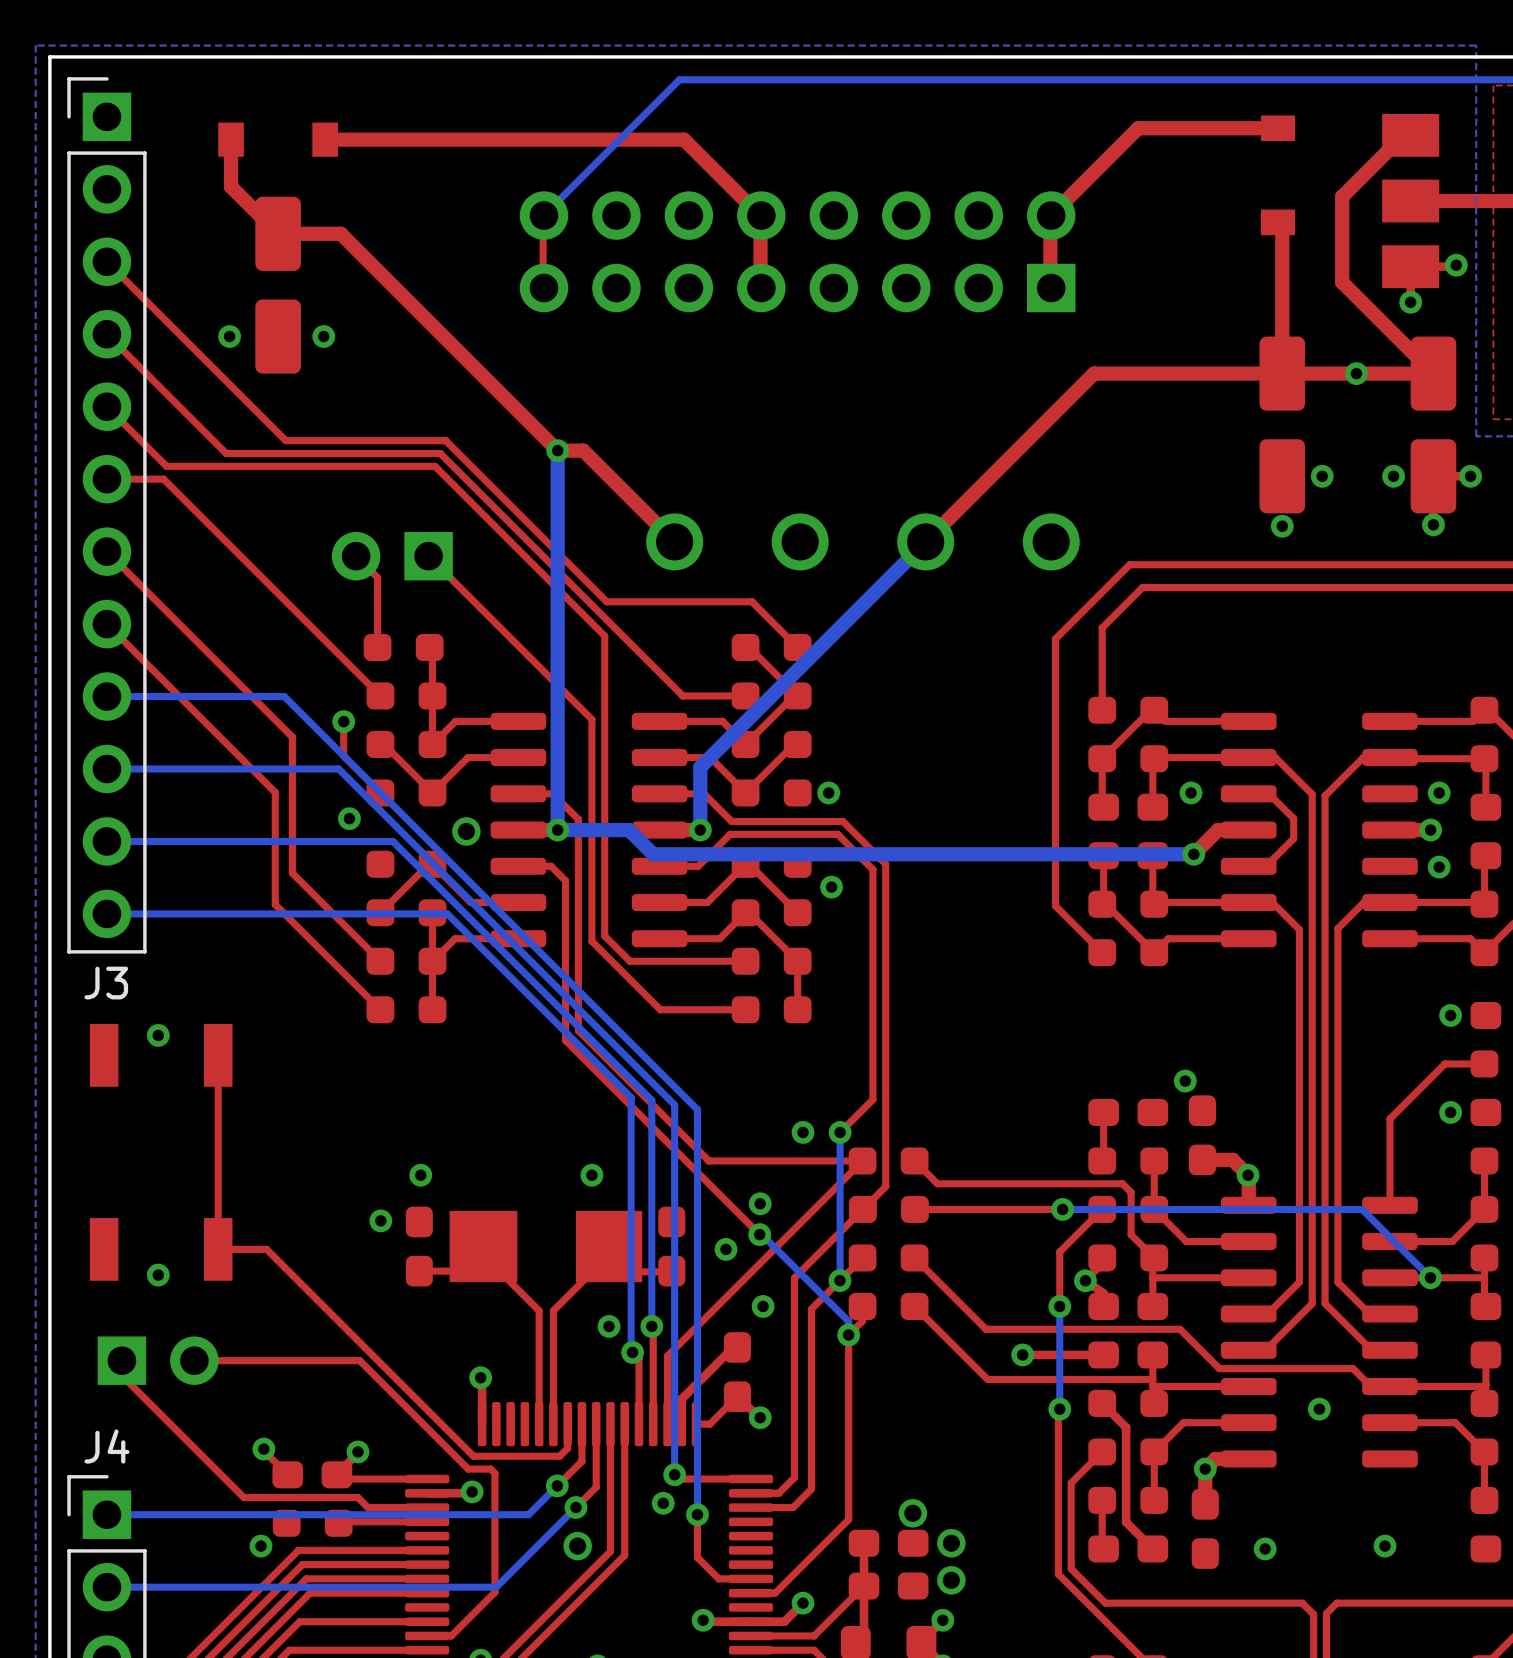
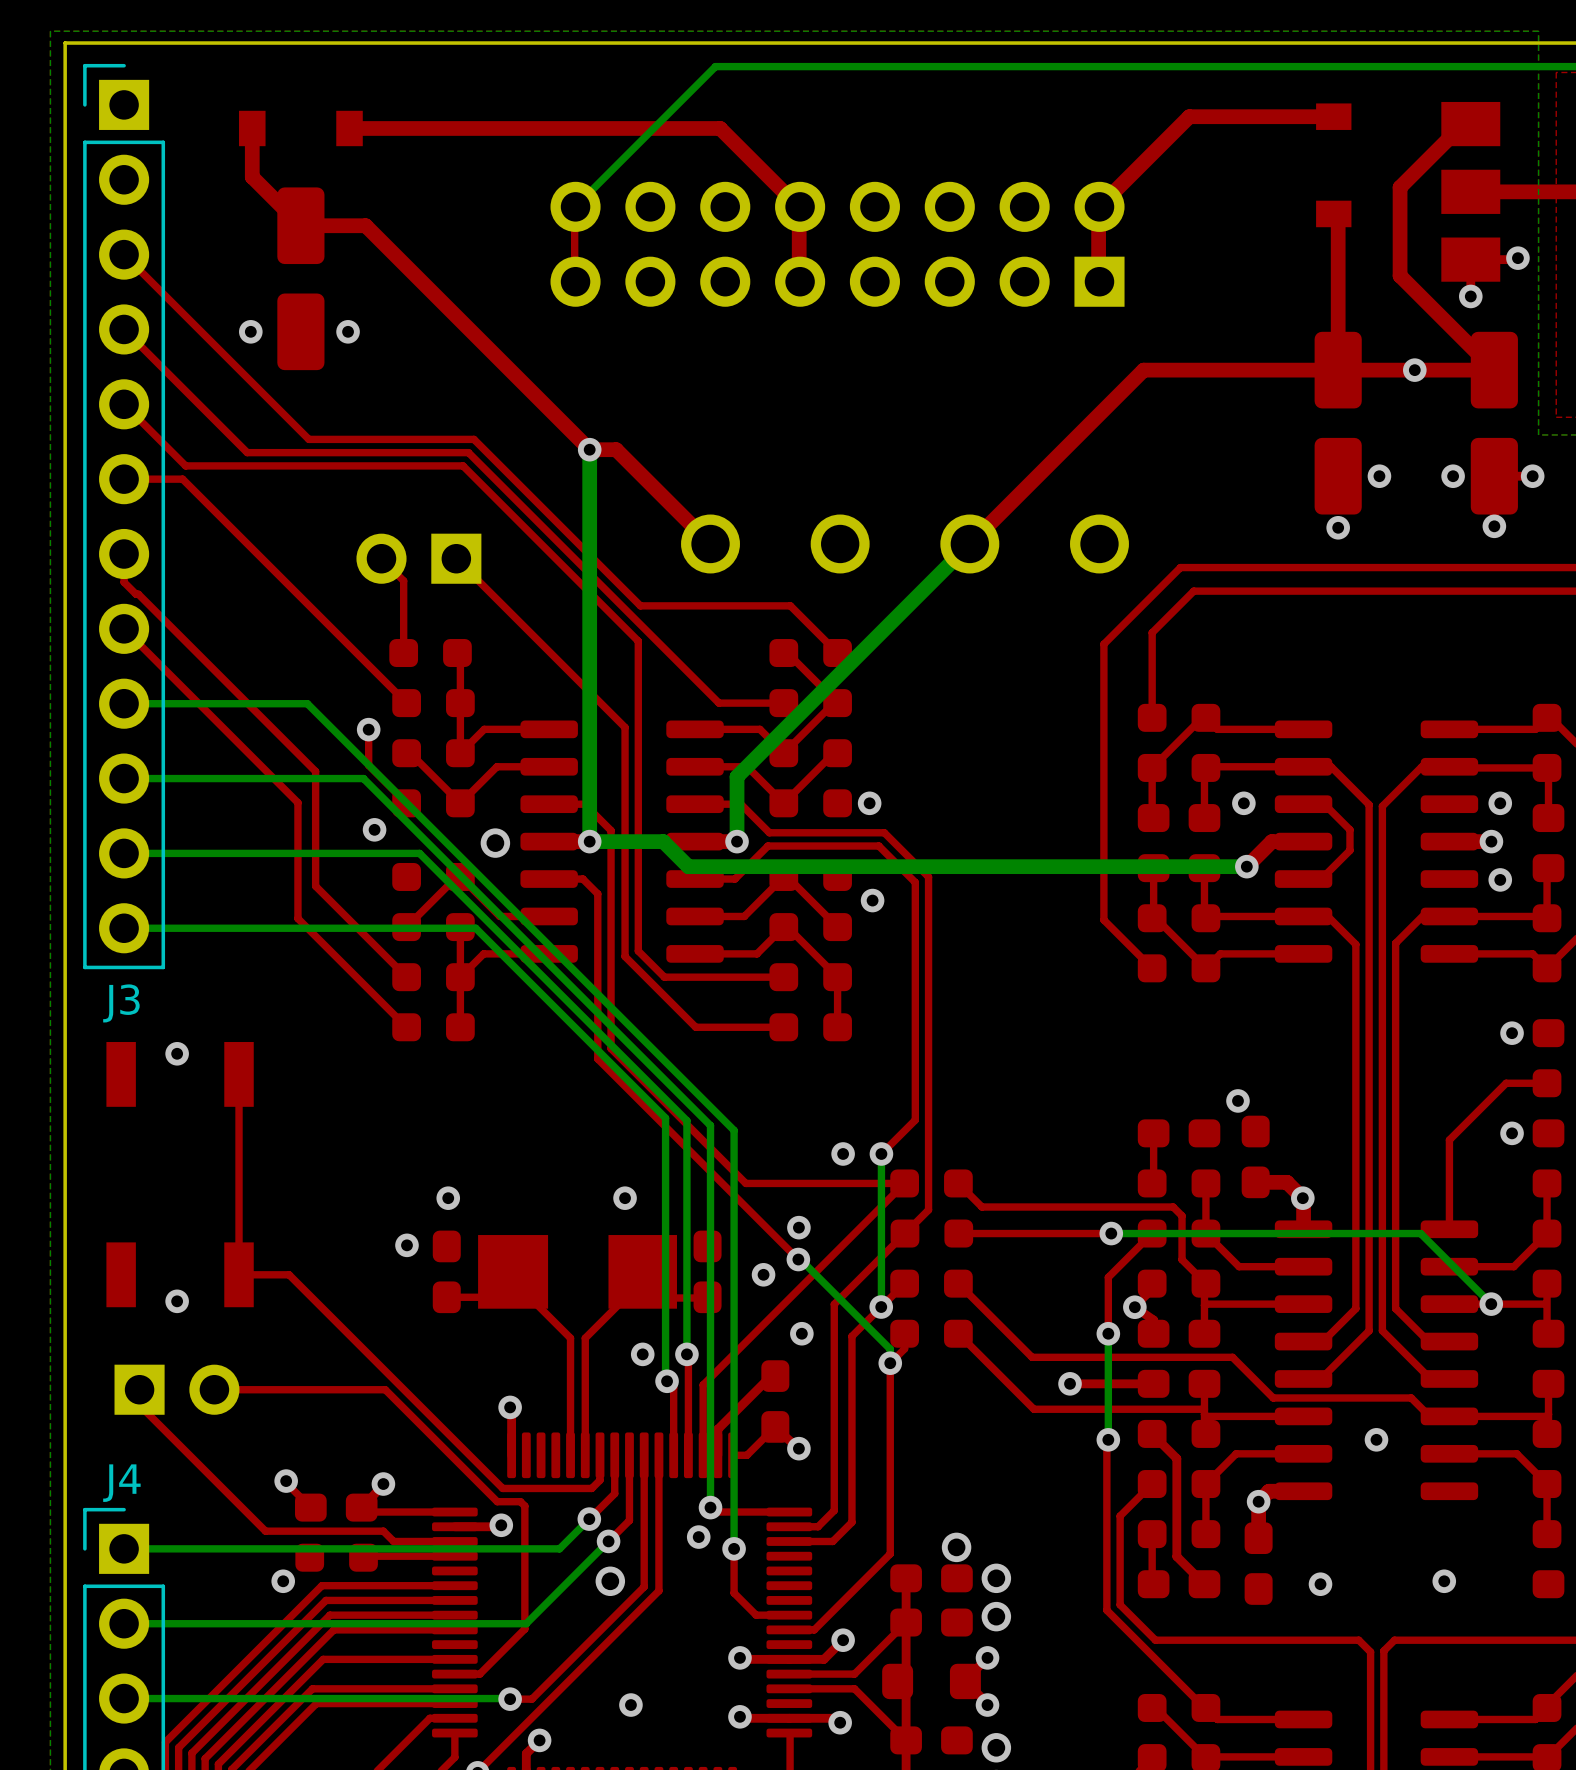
top track: (106, 551) (292, 737) (292, 762) -> (124, 554) (124, 582) (136, 594) (138, 594) (315, 771)

